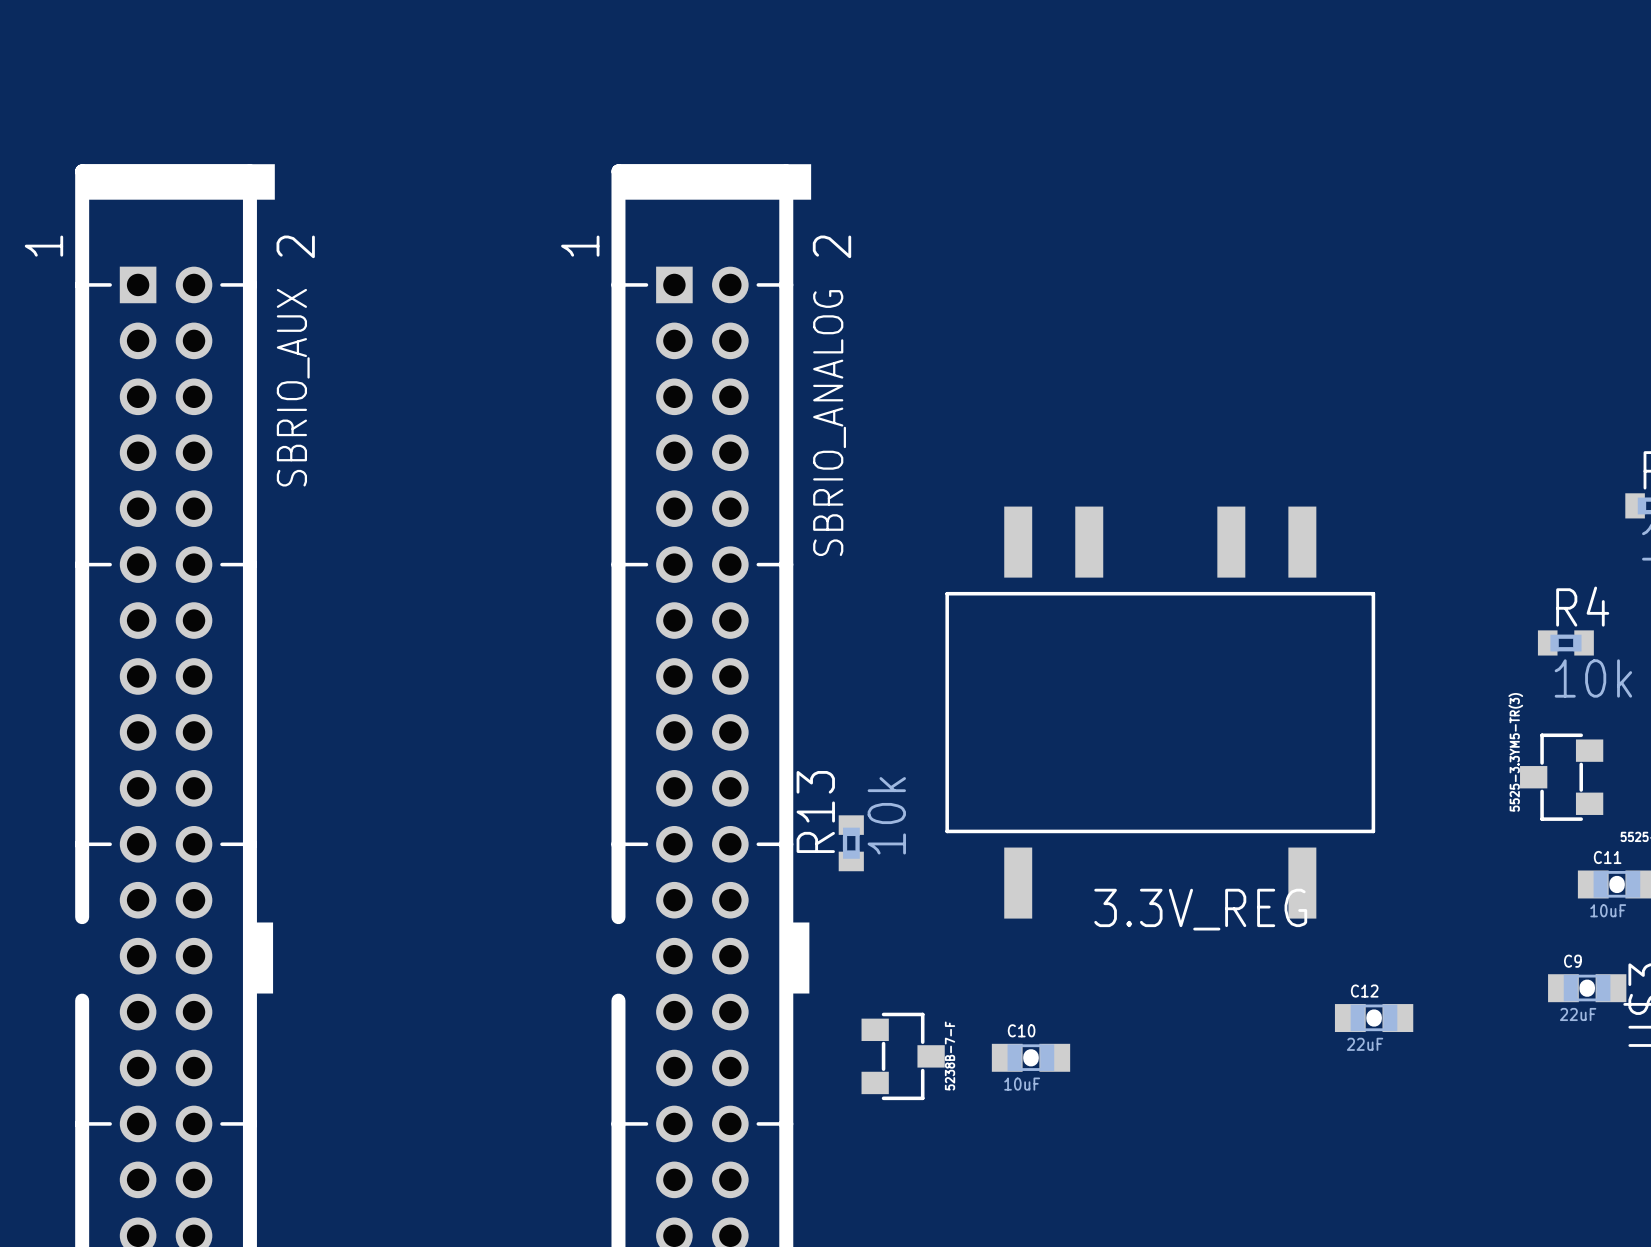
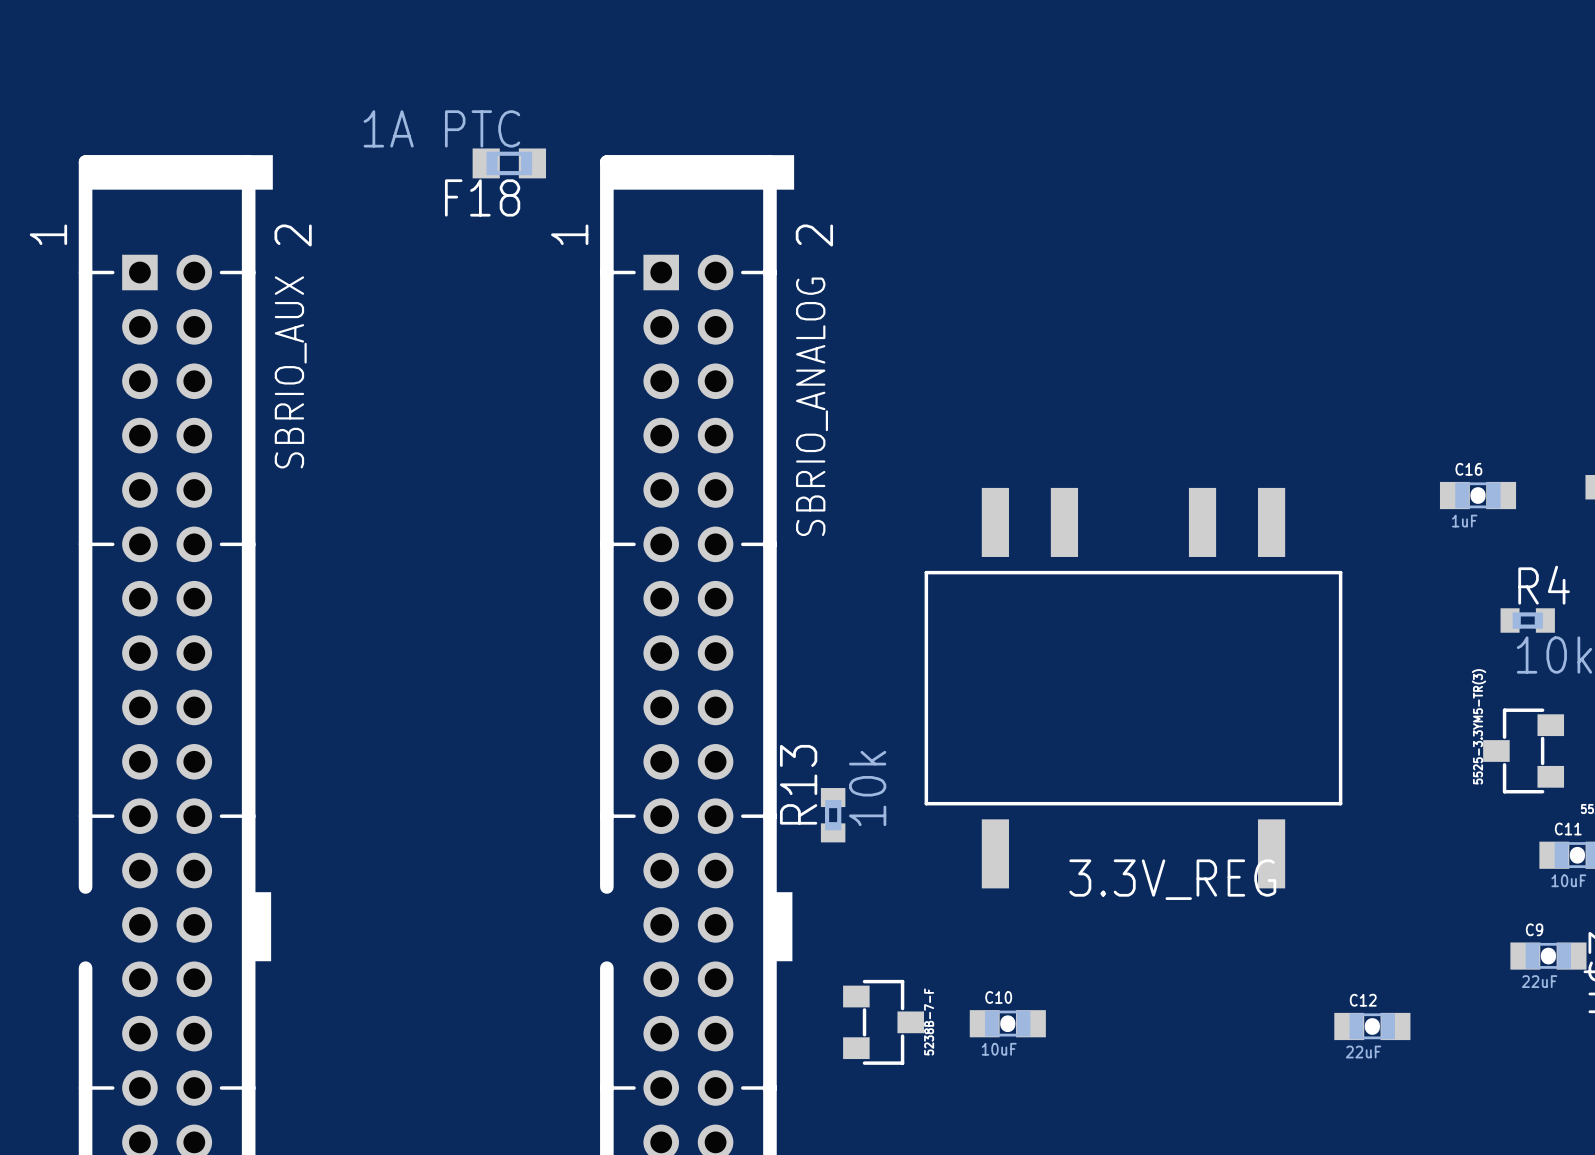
F18: none -> 1A PTC (509, 163)
C16: none -> 1uF (1478, 495)
C12 position: (1374, 1018) -> (1372, 1026)

